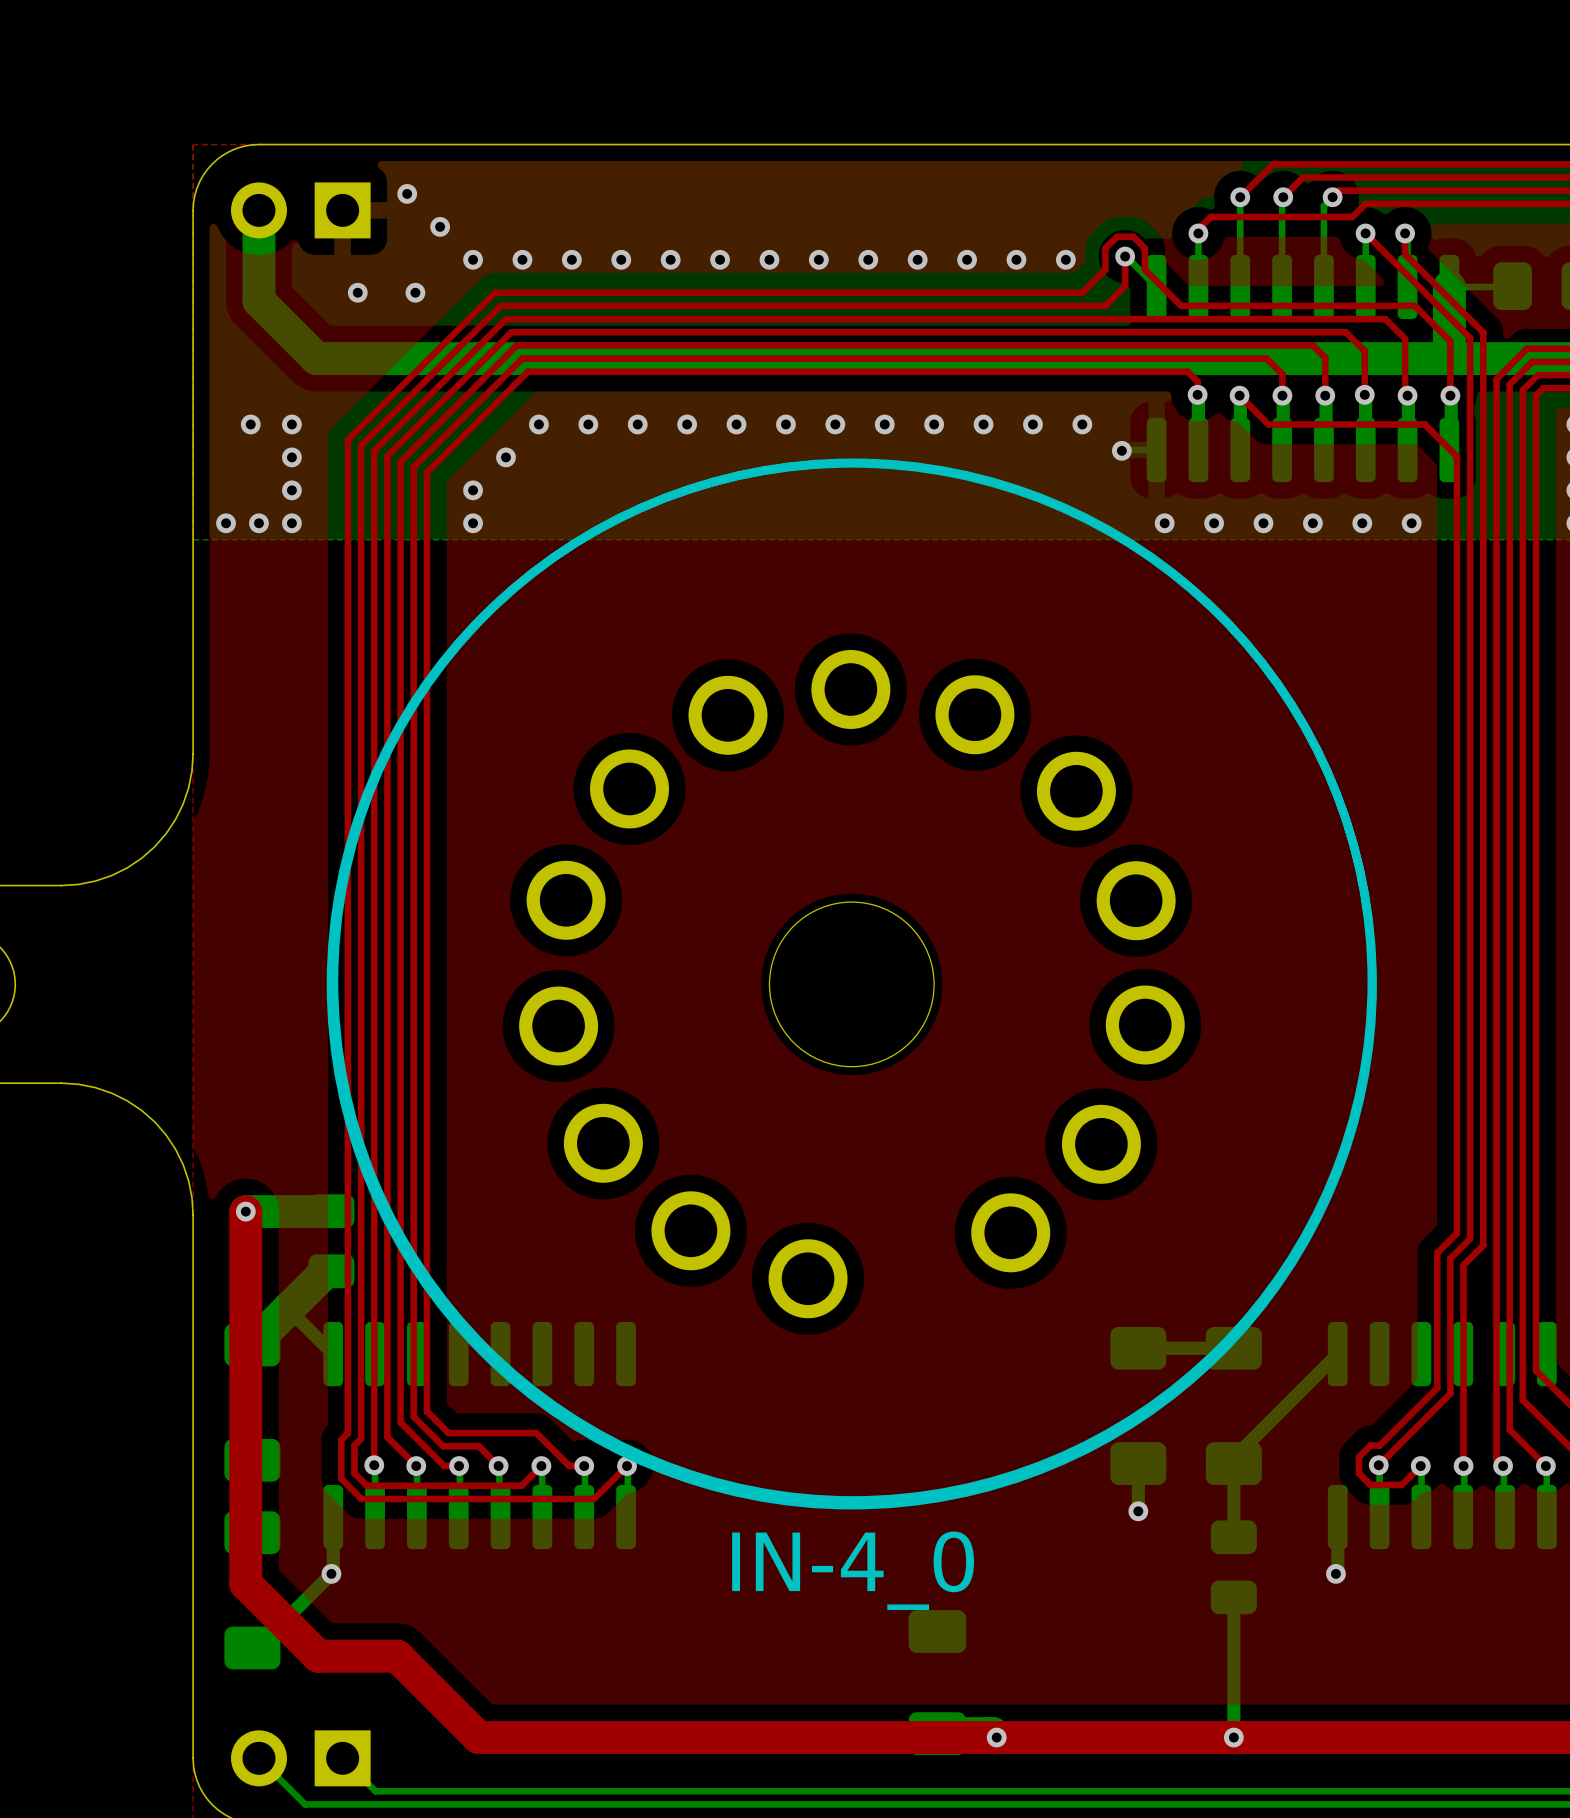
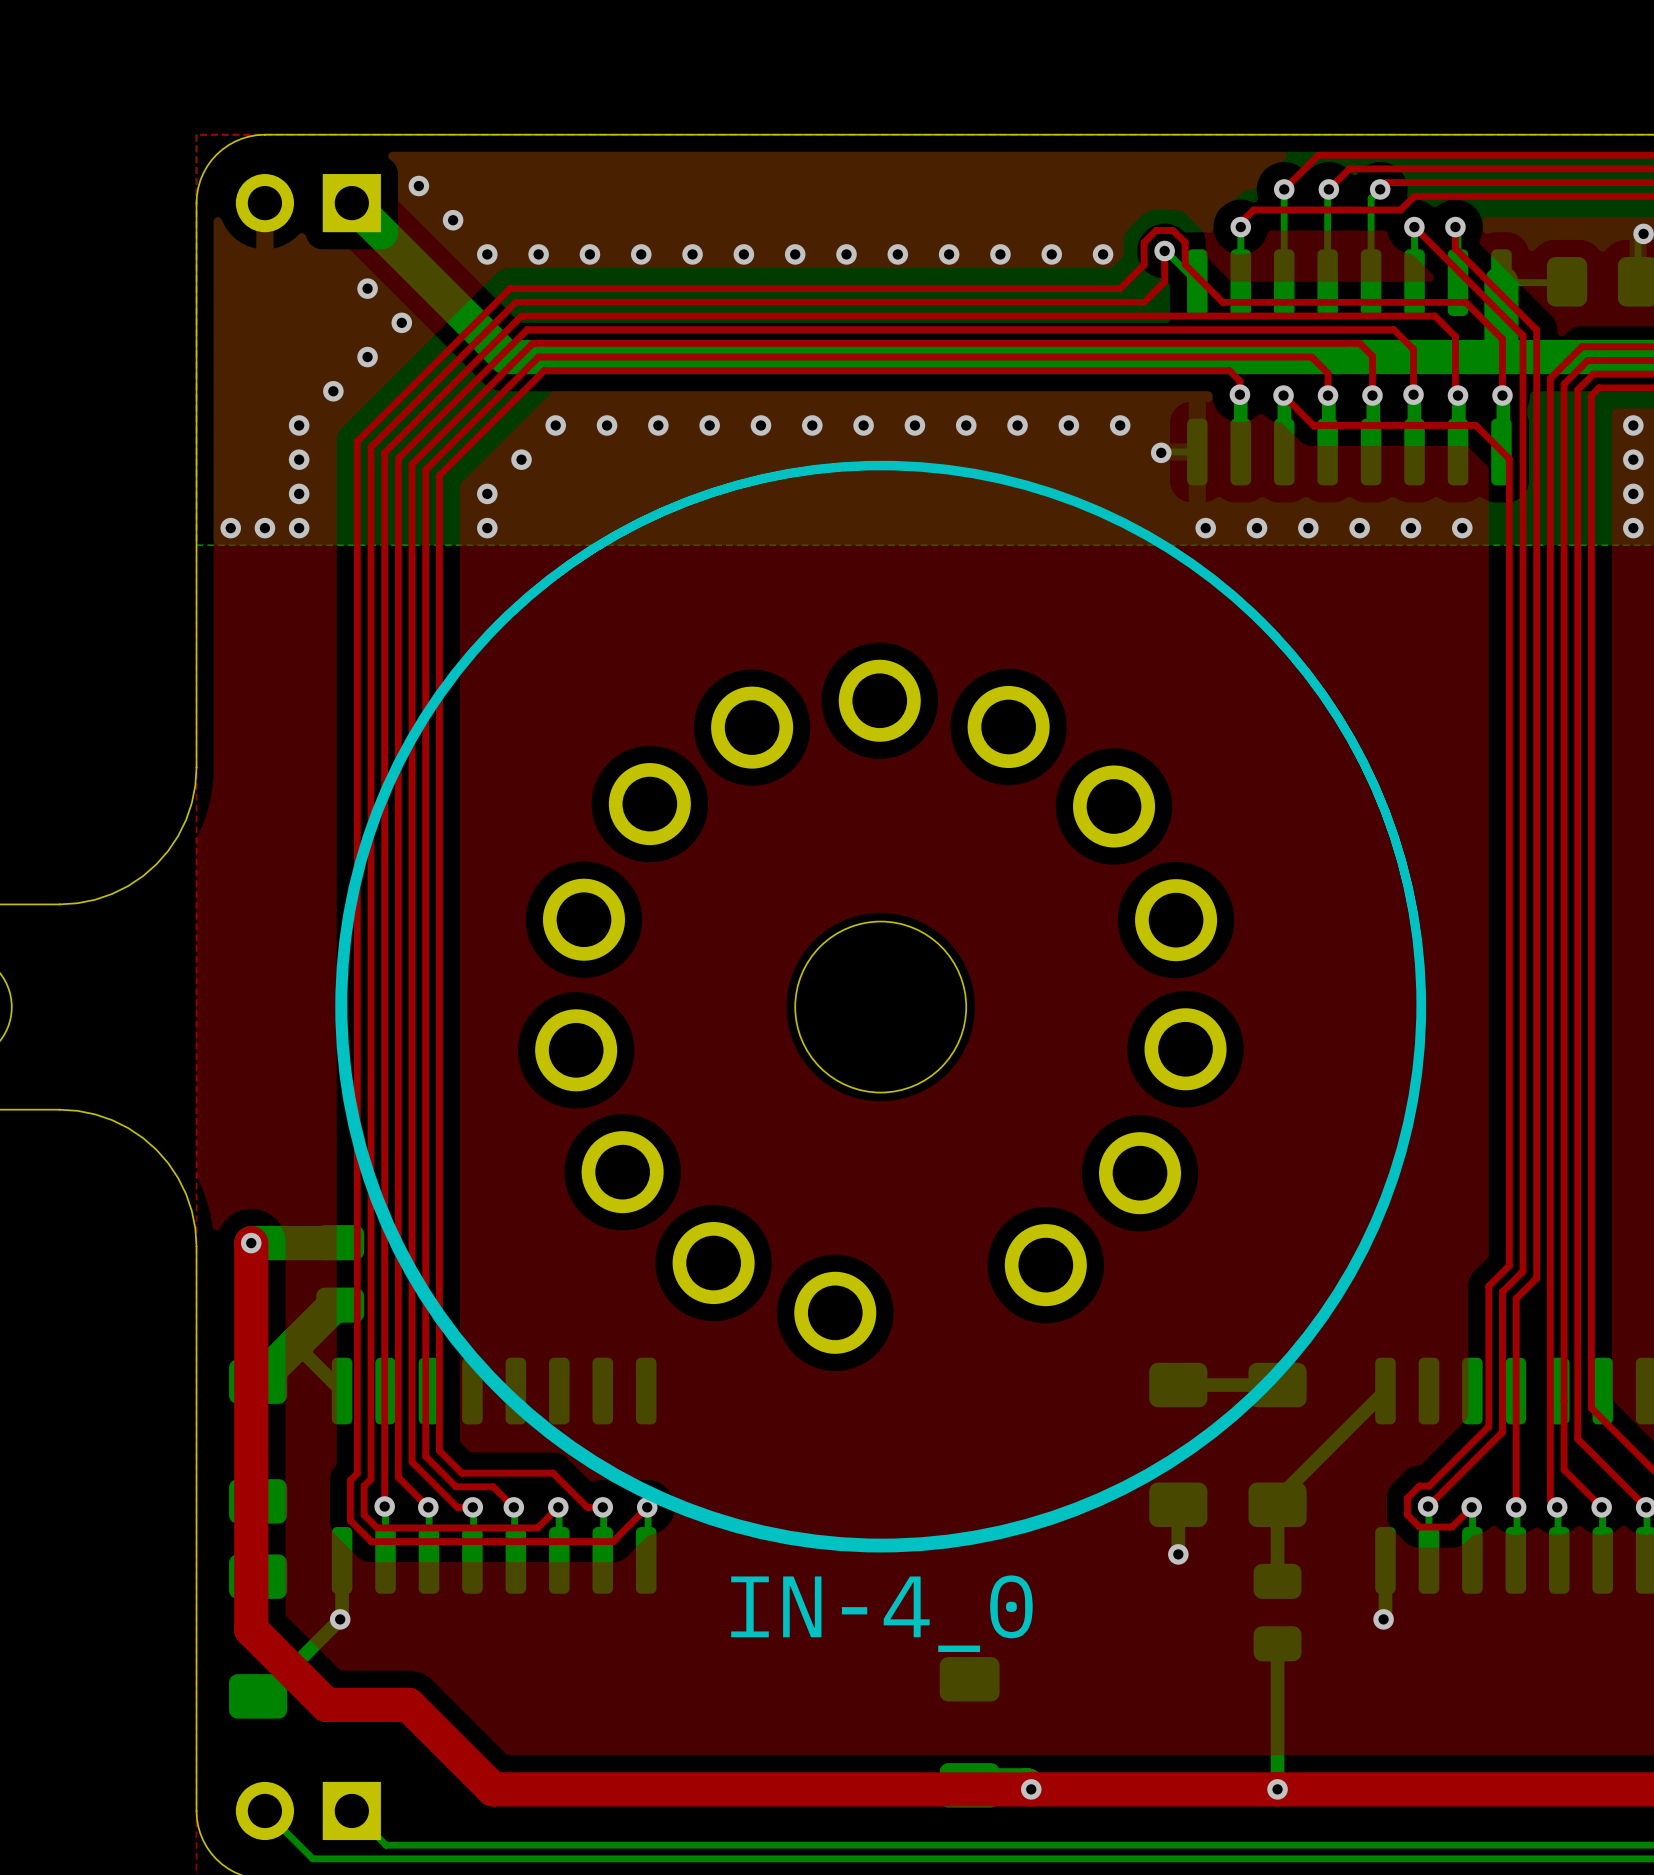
bottom track: (258, 210) (258, 300) (316, 358) (490, 358) -> (351, 203) (505, 357)
via position: (415, 292) -> (401, 322)
via: none -> (367, 357)
via: none -> (333, 391)
via: (250, 424) -> none

